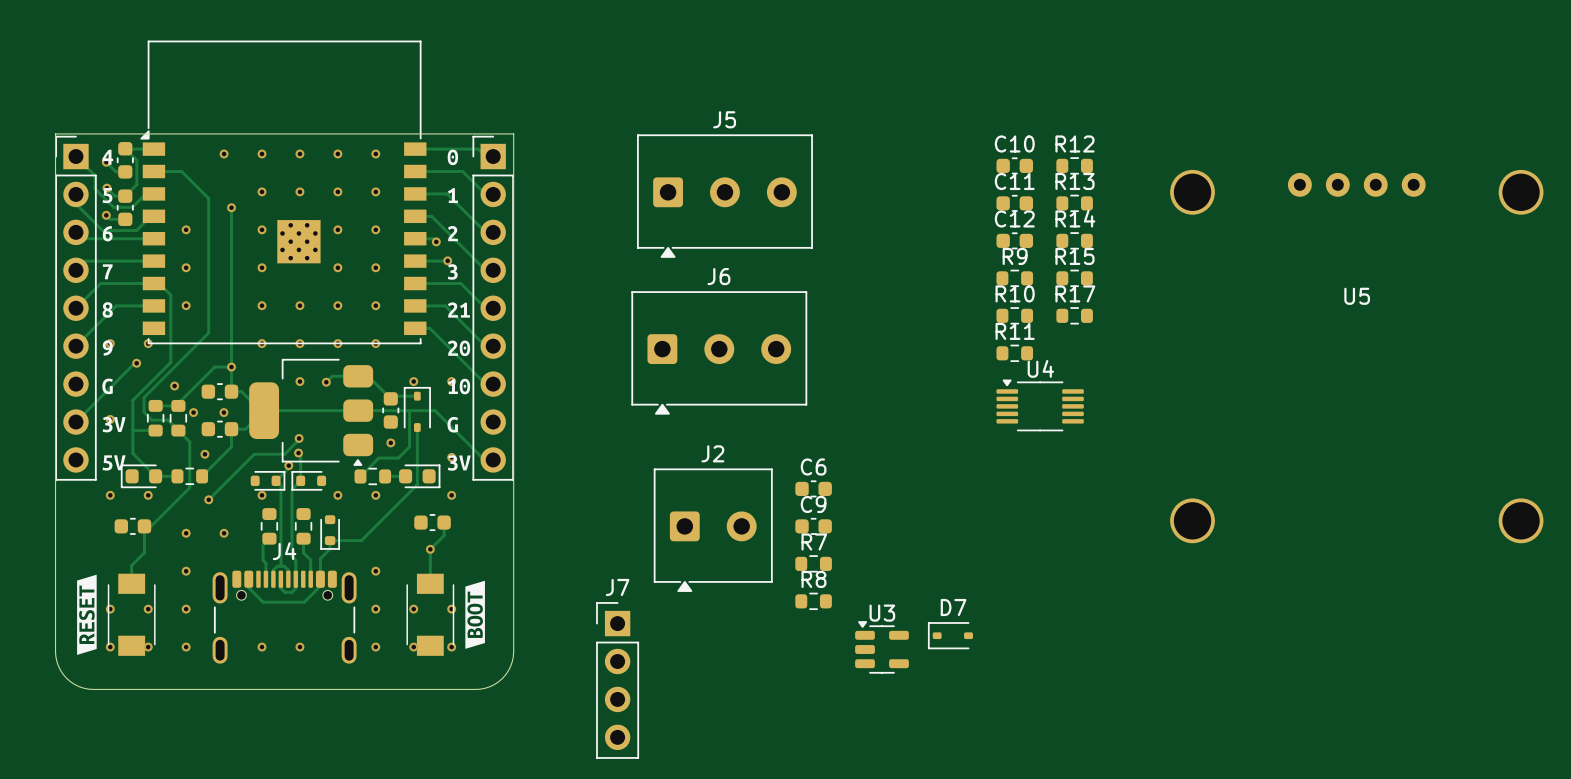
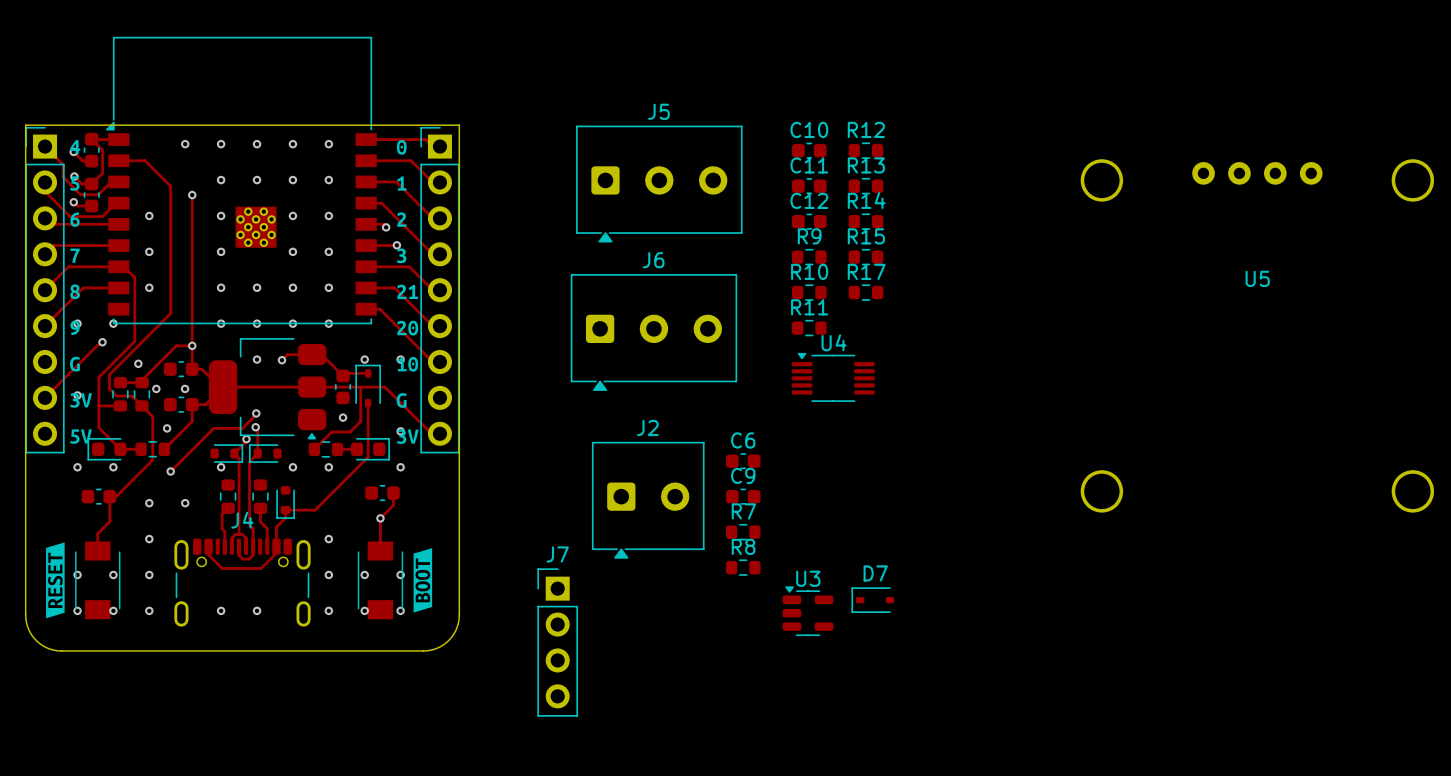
C10 position: (1014, 165) -> (809, 150)
R12 position: (1074, 165) -> (865, 150)
C11 position: (1014, 203) -> (809, 186)
R13 position: (1074, 203) -> (865, 186)
C12 position: (1014, 240) -> (809, 221)
R14 position: (1074, 240) -> (865, 221)
R9 position: (1014, 278) -> (809, 257)
R15 position: (1074, 278) -> (865, 257)
R10 position: (1014, 315) -> (809, 292)
R17 position: (1074, 315) -> (865, 292)
R11 position: (1014, 353) -> (809, 328)
U4 position: (1040, 405) -> (833, 377)

